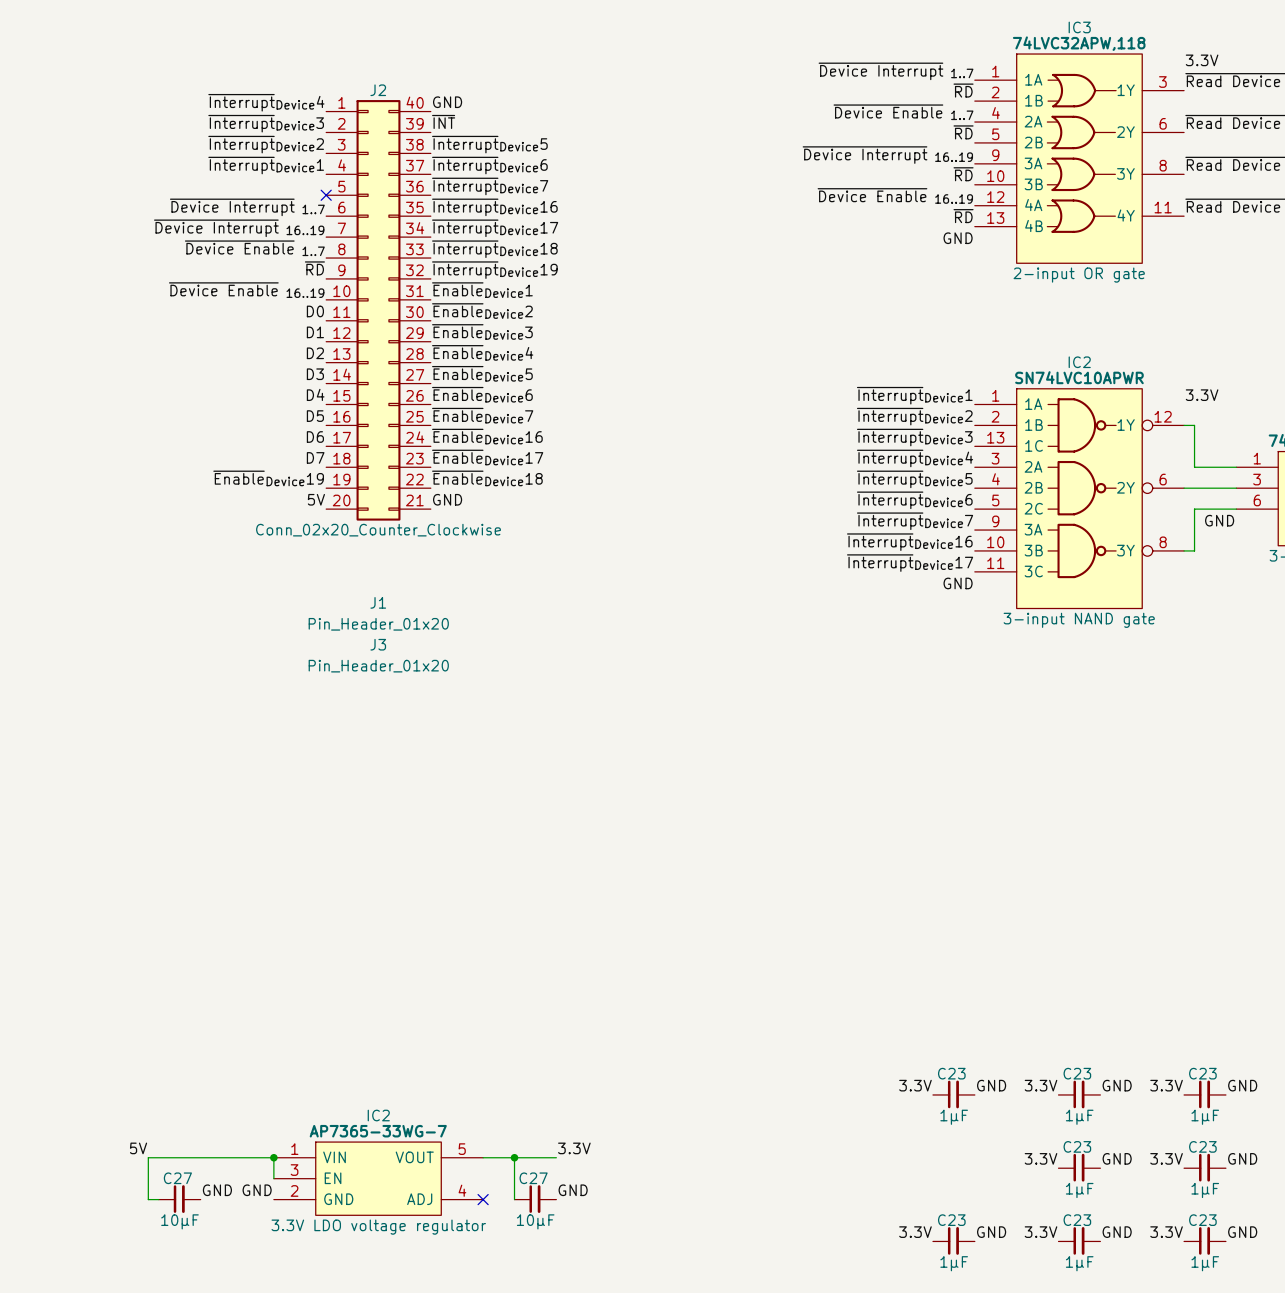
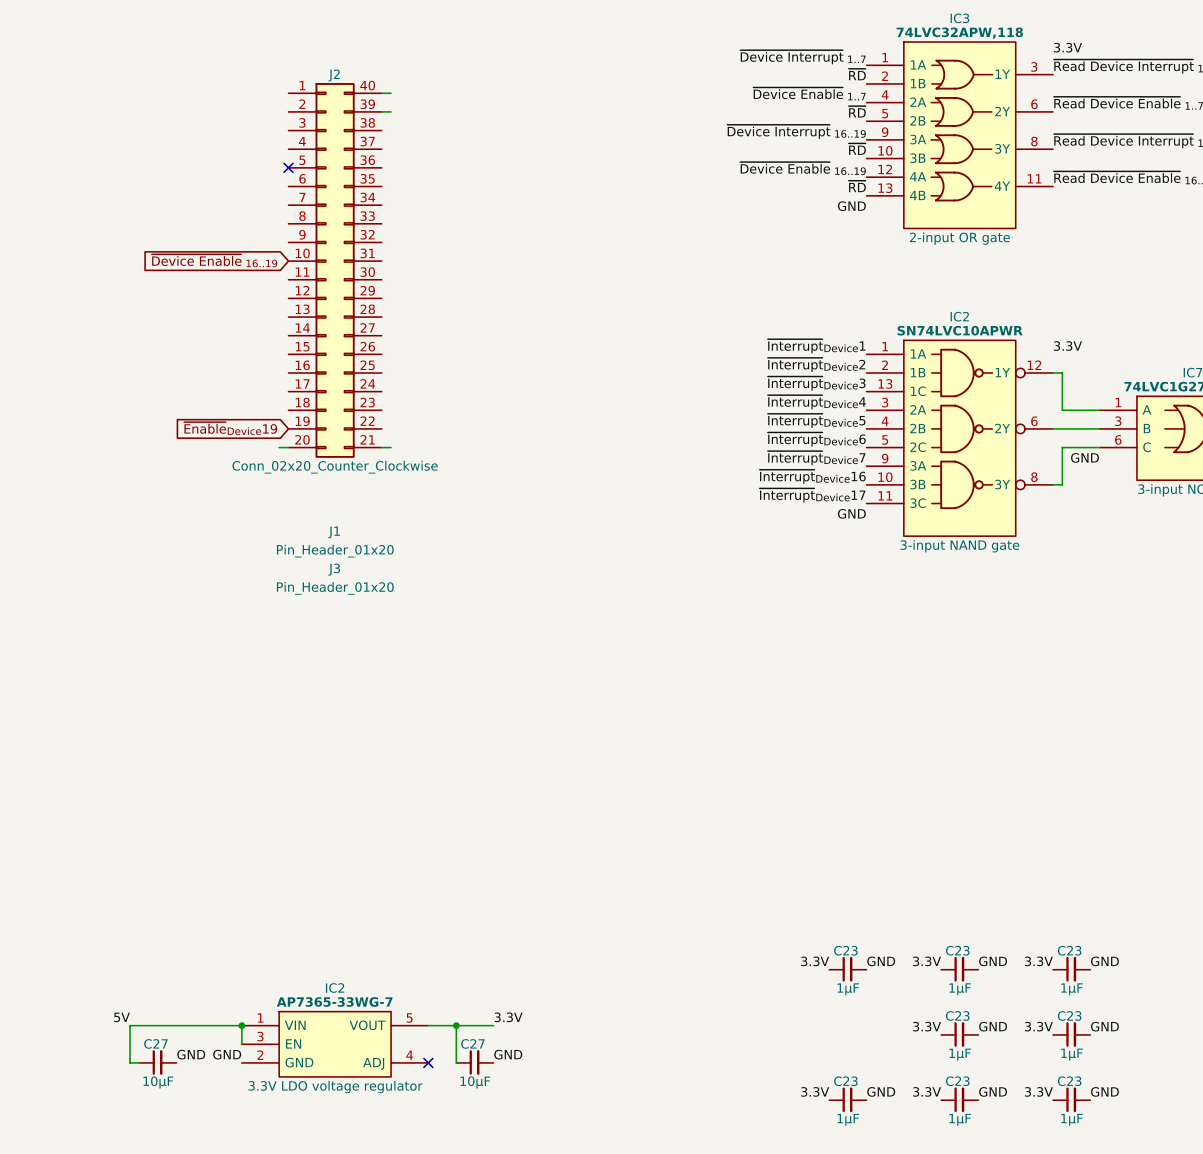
label: ~{Interrupt}Device4 (266, 102) -> none
label: GND (447, 102) -> none
wire: none -> (381, 93) (391, 93)
label: ~{INT} (443, 121) -> none
label: ~{Interrupt}Device3 (266, 123) -> none
wire: none -> (381, 111) (391, 111)
label: ~{Interrupt}Device2 (266, 144) -> none
label: ~{Interrupt}Device5 (489, 144) -> none
label: ~{Interrupt}Device1 (266, 165) -> none
label: ~{Interrupt}Device6 (489, 165) -> none
label: ~{Interrupt}Device7 (490, 186) -> none
label: ~{Device Interrupt} 1..7 (247, 207) -> none
label: ~{Interrupt}Device16 (494, 207) -> none
label: ~{Device Interrupt} 16..19 (239, 228) -> none
label: ~{Interrupt}Device17 (495, 228) -> none
label: ~{Device Enable} 1..7 (254, 248) -> none
label: ~{Interrupt}Device18 (494, 249) -> none
label: ~{RD} (314, 268) -> none
label: ~{Interrupt}Device19 (494, 270) -> none
label: ~{Device Enable} 16..19 (246, 290) -> none
label: ~{Enable}Device1 (482, 290) -> none
global label: none -> ~{Device Enable} 16..19 (214, 260)
label: D0 (315, 311) -> none
label: ~{Enable}Device2 (482, 311) -> none
label: ~{Enable}Device3 (482, 331) -> none
label: D1 (315, 332) -> none
label: ~{Enable}Device4 (482, 352) -> none
label: D2 (315, 353) -> none
label: ~{Enable}Device5 (482, 373) -> none
label: D3 (315, 374) -> none
label: D4 (315, 394) -> none
label: ~{Enable}Device6 (482, 394) -> none
label: ~{Enable}Device7 (482, 415) -> none
label: D5 (315, 416) -> none
label: ~{Enable}Device16 (487, 436) -> none
label: D6 (315, 437) -> none
label: D7 (315, 457) -> none
label: ~{Enable}Device17 (487, 457) -> none
label: ~{Enable}Device19 (268, 478) -> none
label: ~{Enable}Device18 (487, 478) -> none
global label: none -> ~{Enable}Device19 (230, 428)
label: 5V (316, 499) -> none
label: GND (447, 499) -> none
wire: none -> (279, 447) (288, 447)
wire: none -> (381, 447) (391, 447)

